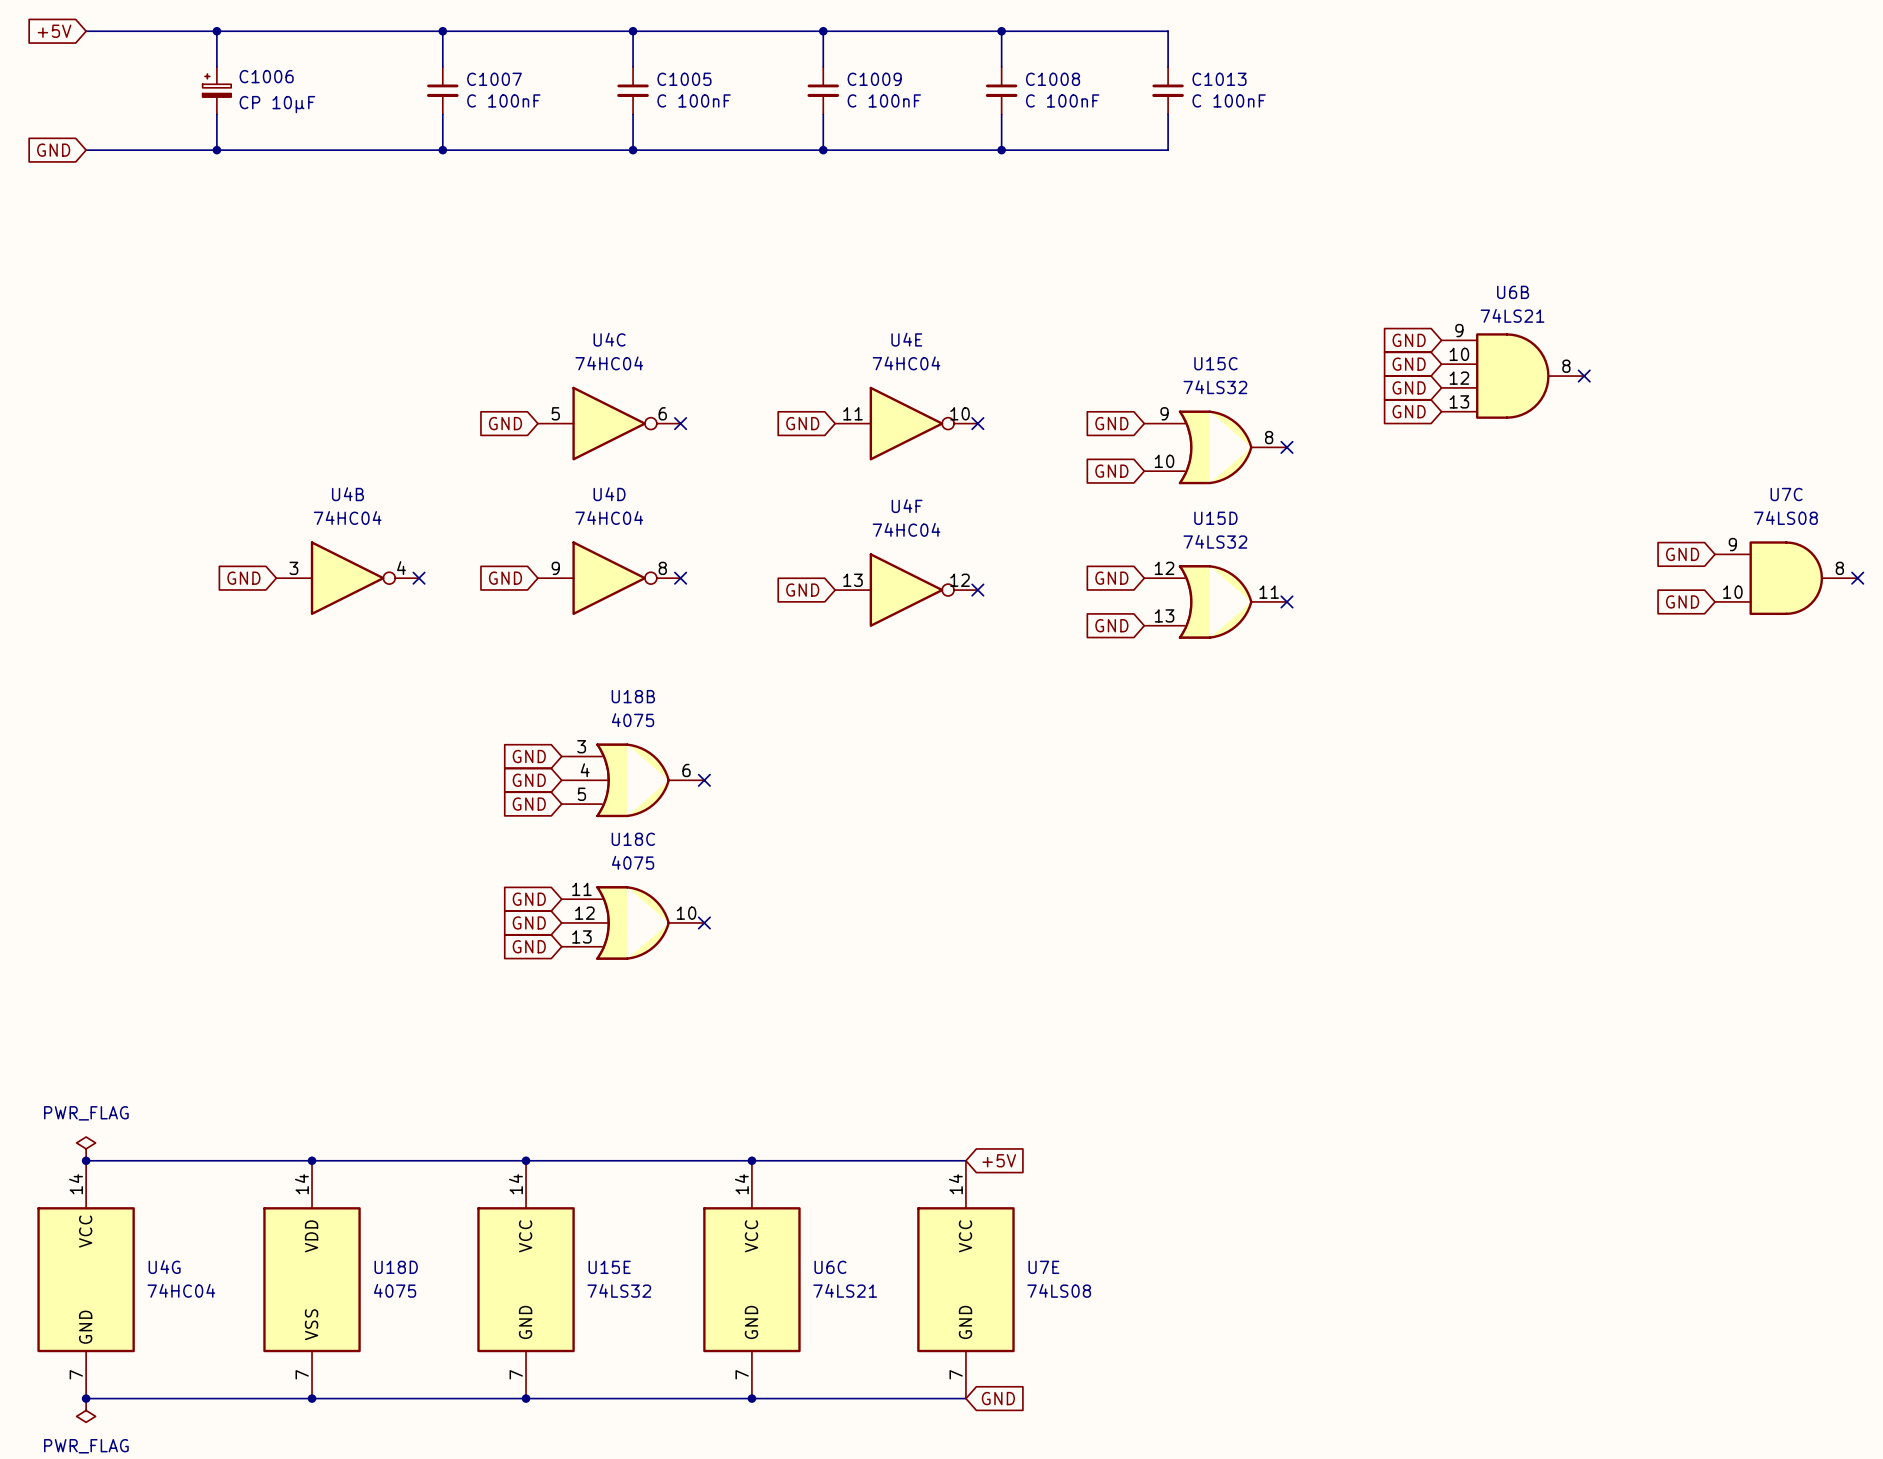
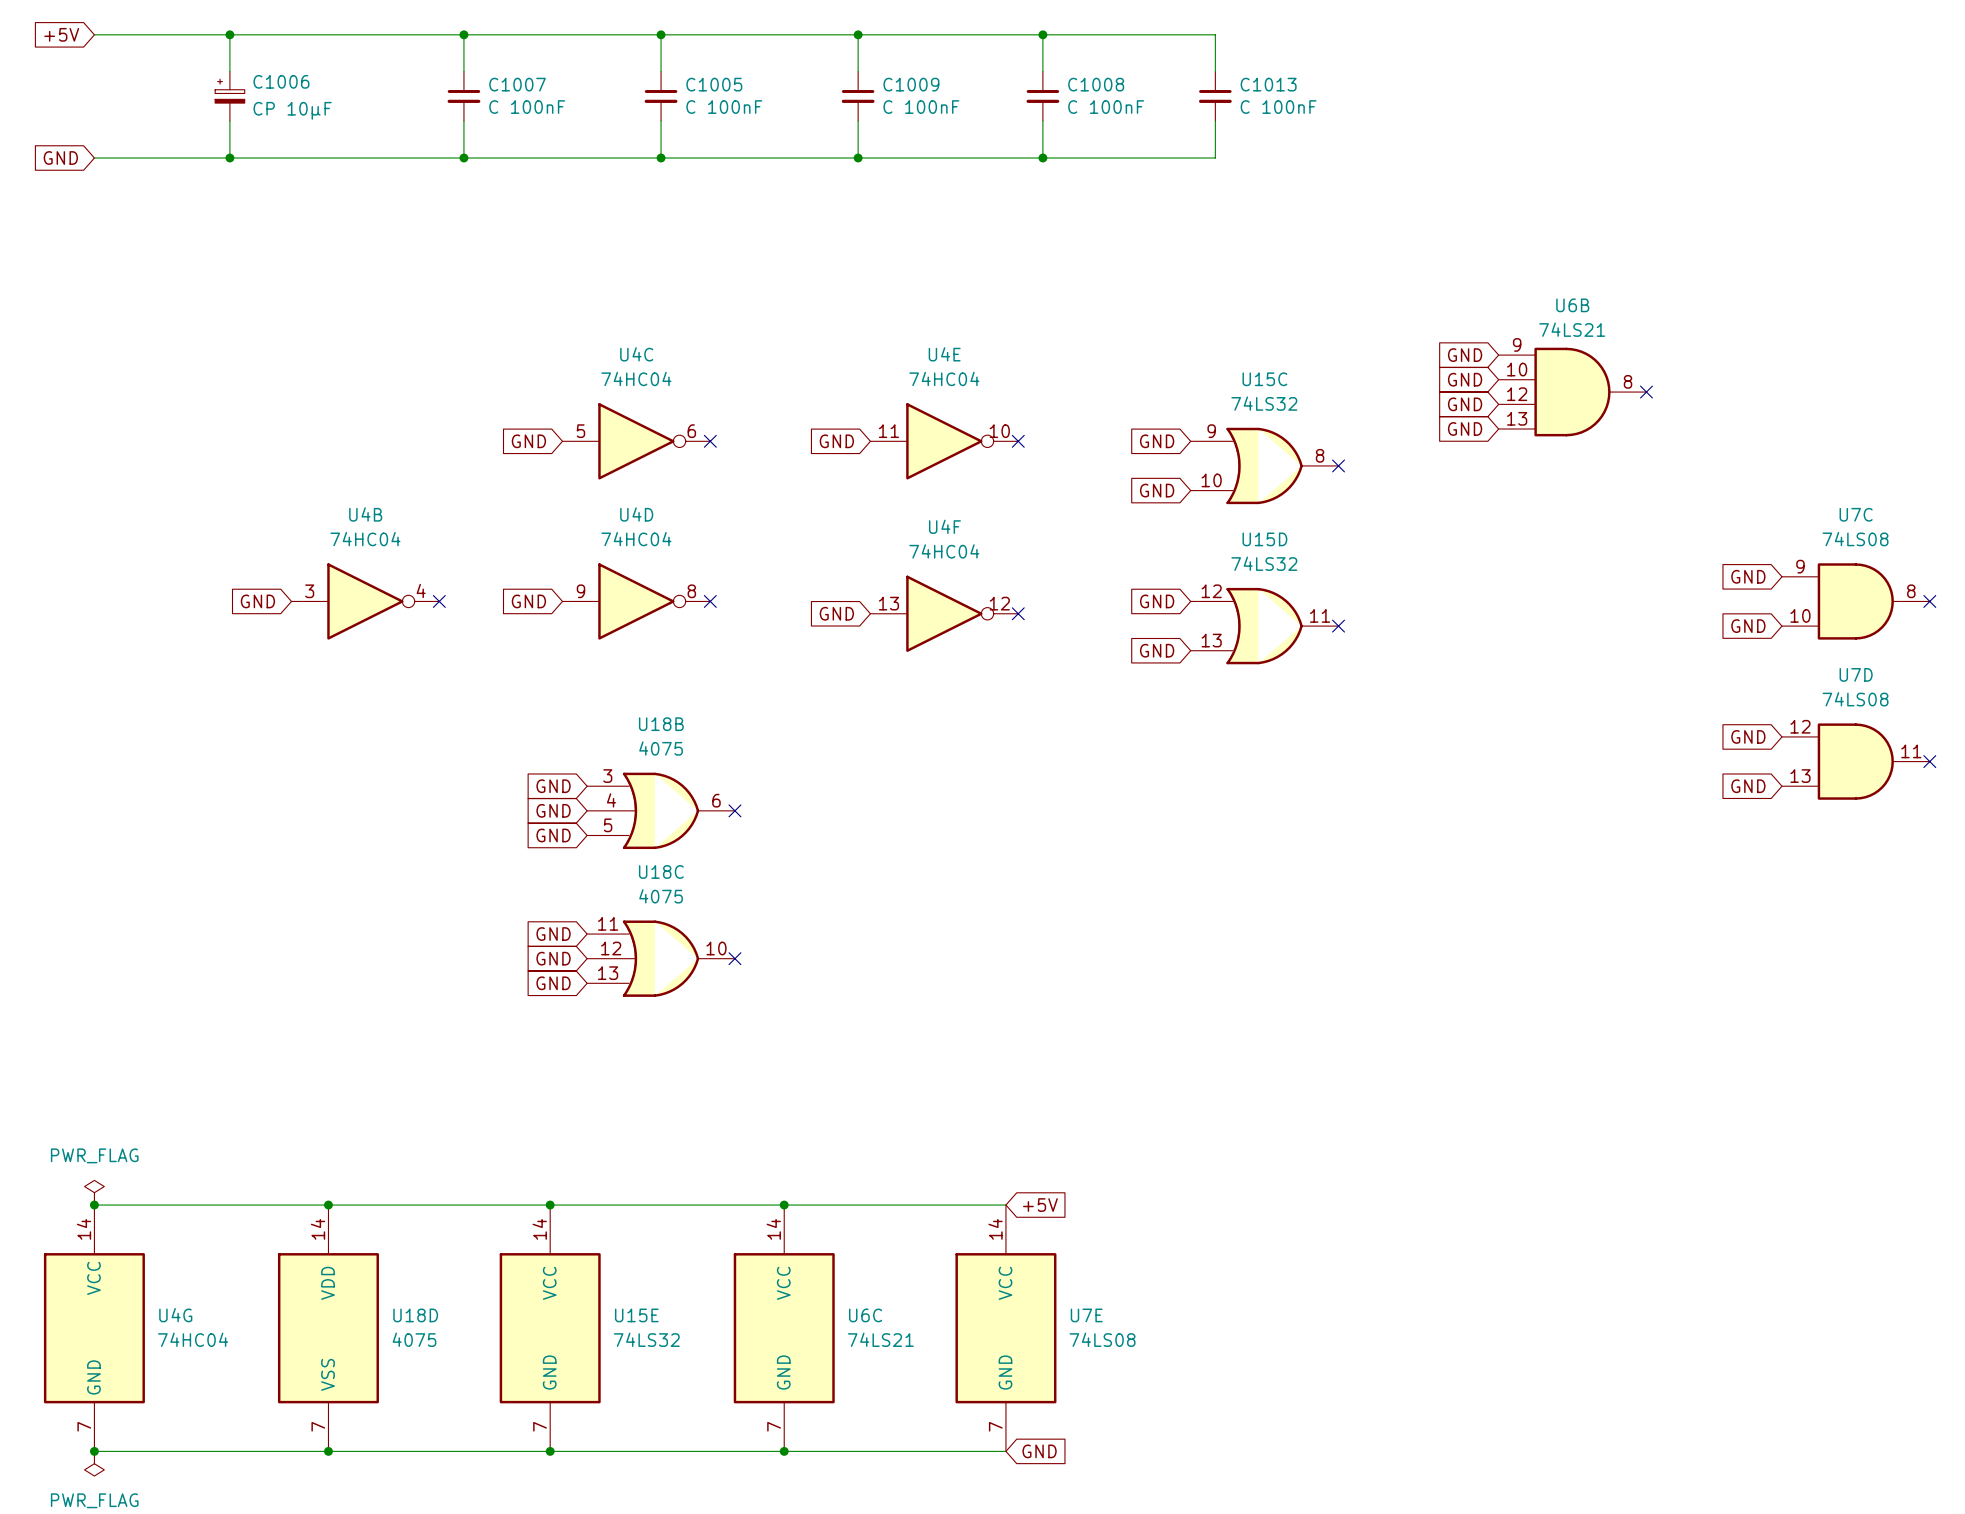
global label: none -> GND (1748, 736)
U7D: none -> 74LS08 (1855, 761)
no-connect mark: none -> (1929, 761)
global label: none -> GND (1748, 786)

